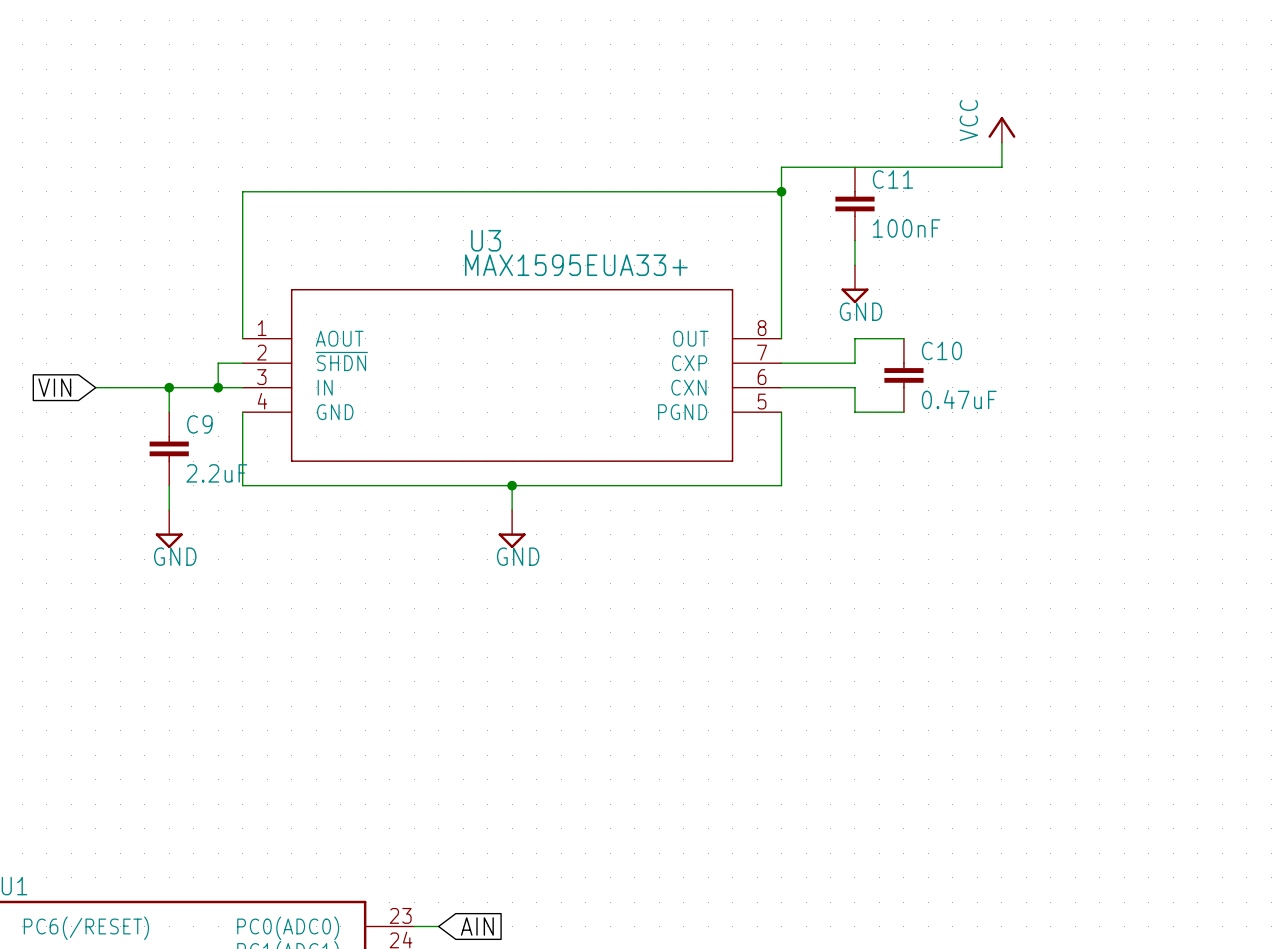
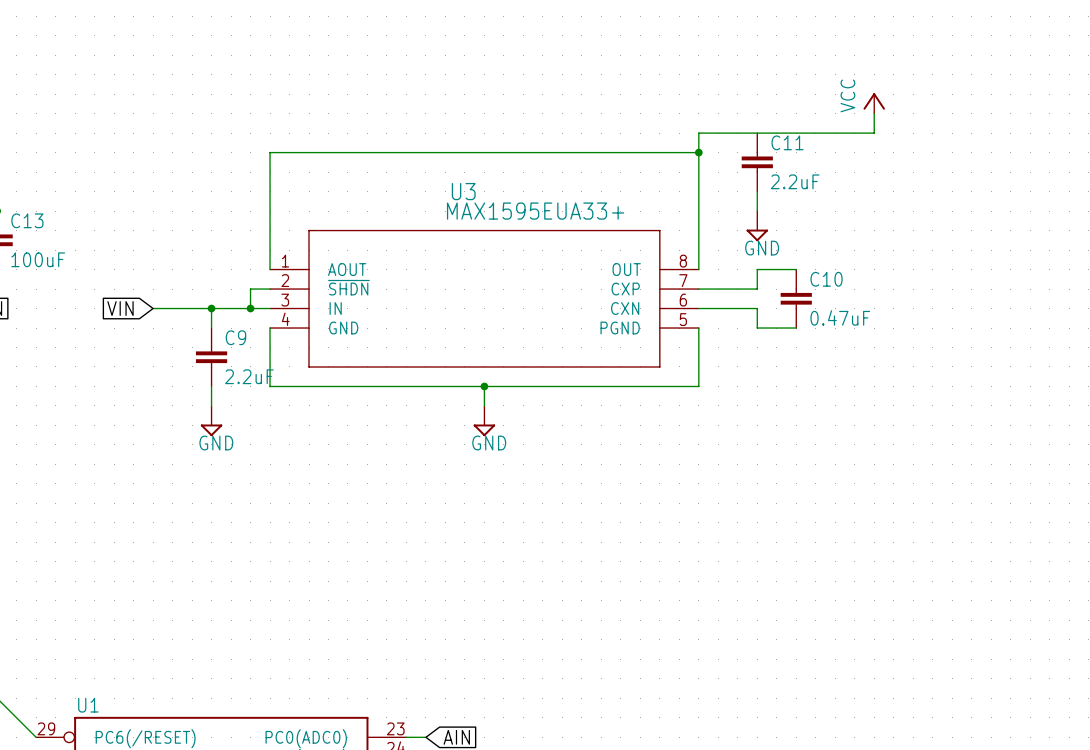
C11 value: 100nF (906, 228) -> 2.2uF (795, 181)

